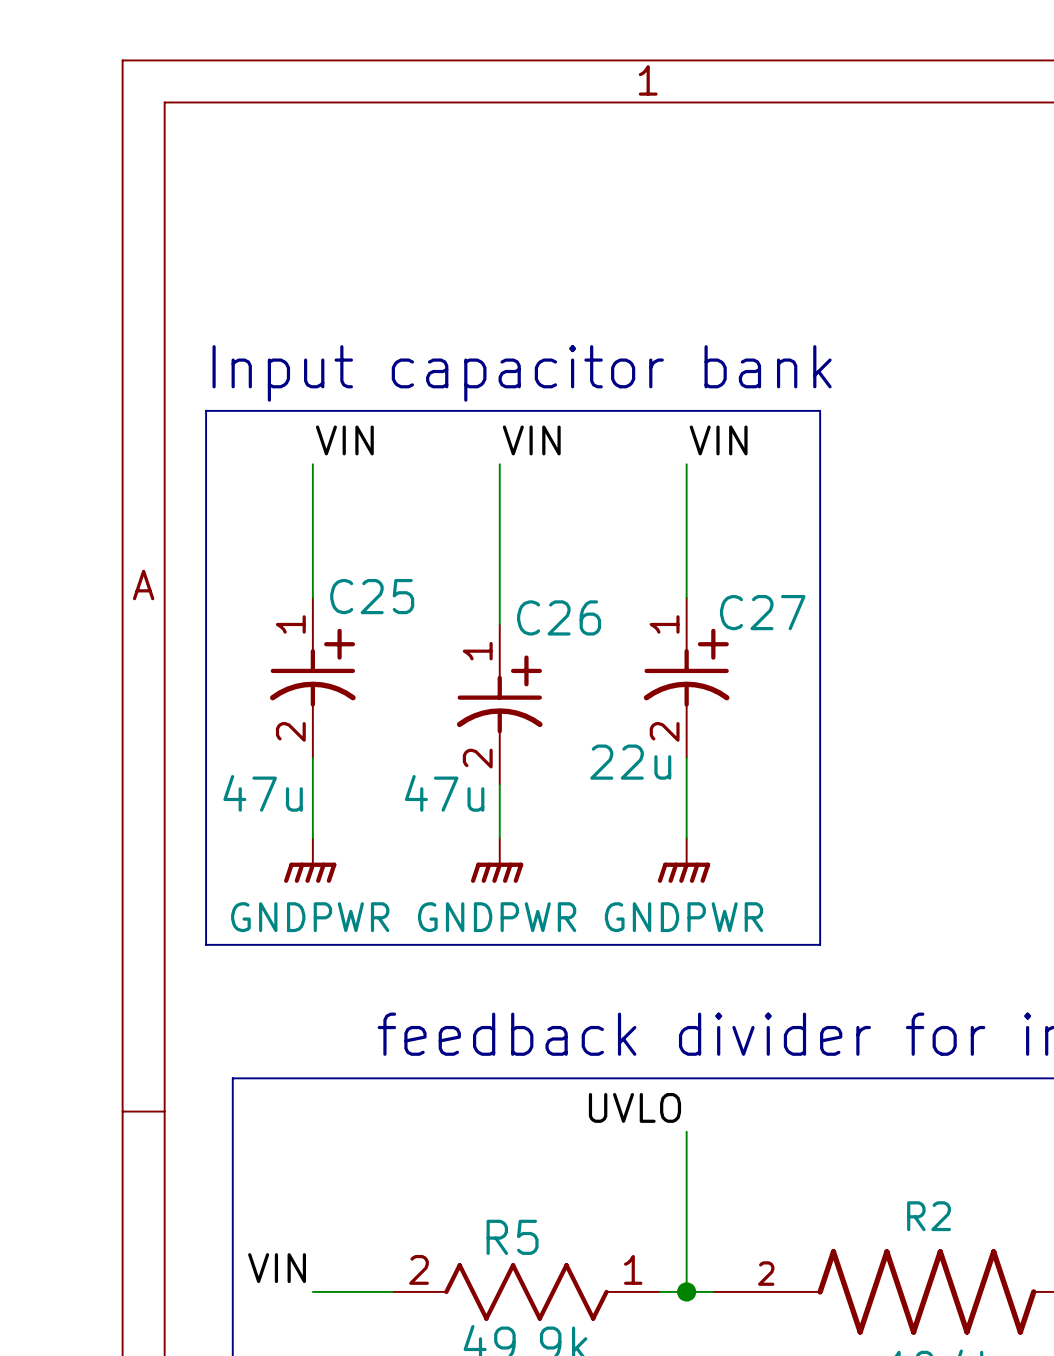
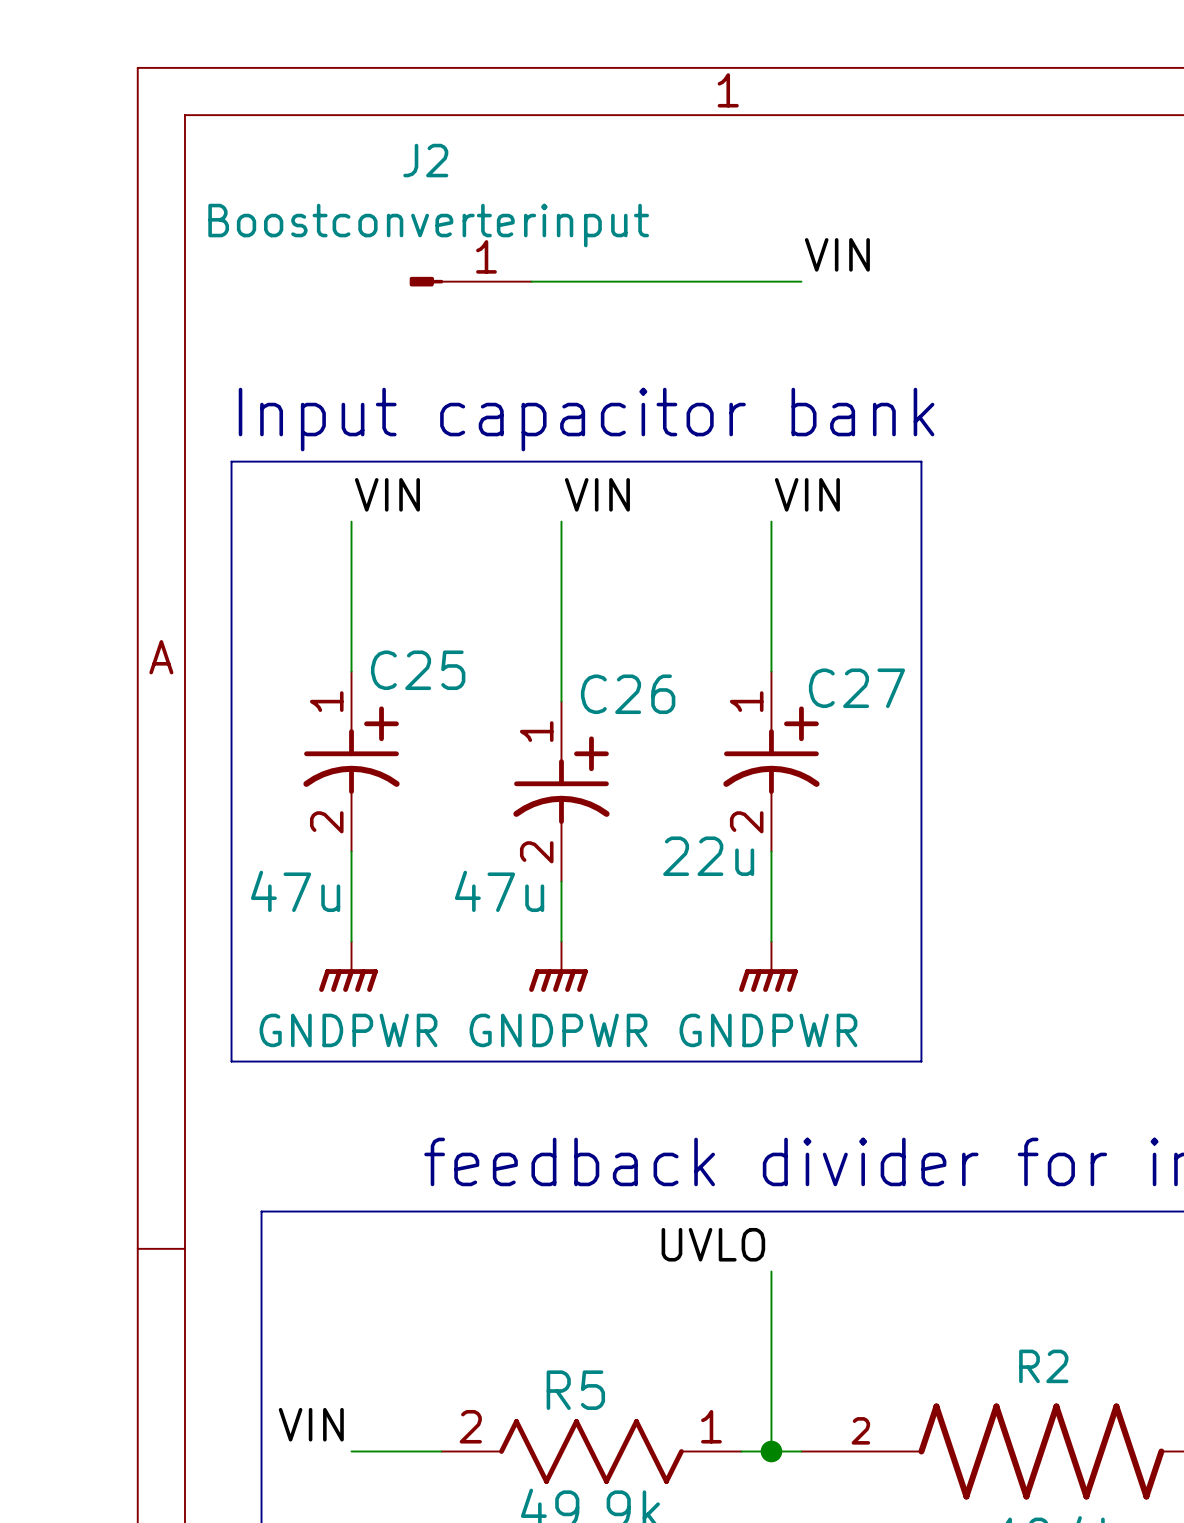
label: none -> VIN (837, 254)
J2: none -> Boostconverterinput (470, 281)
wire: none -> (531, 281) (801, 281)

